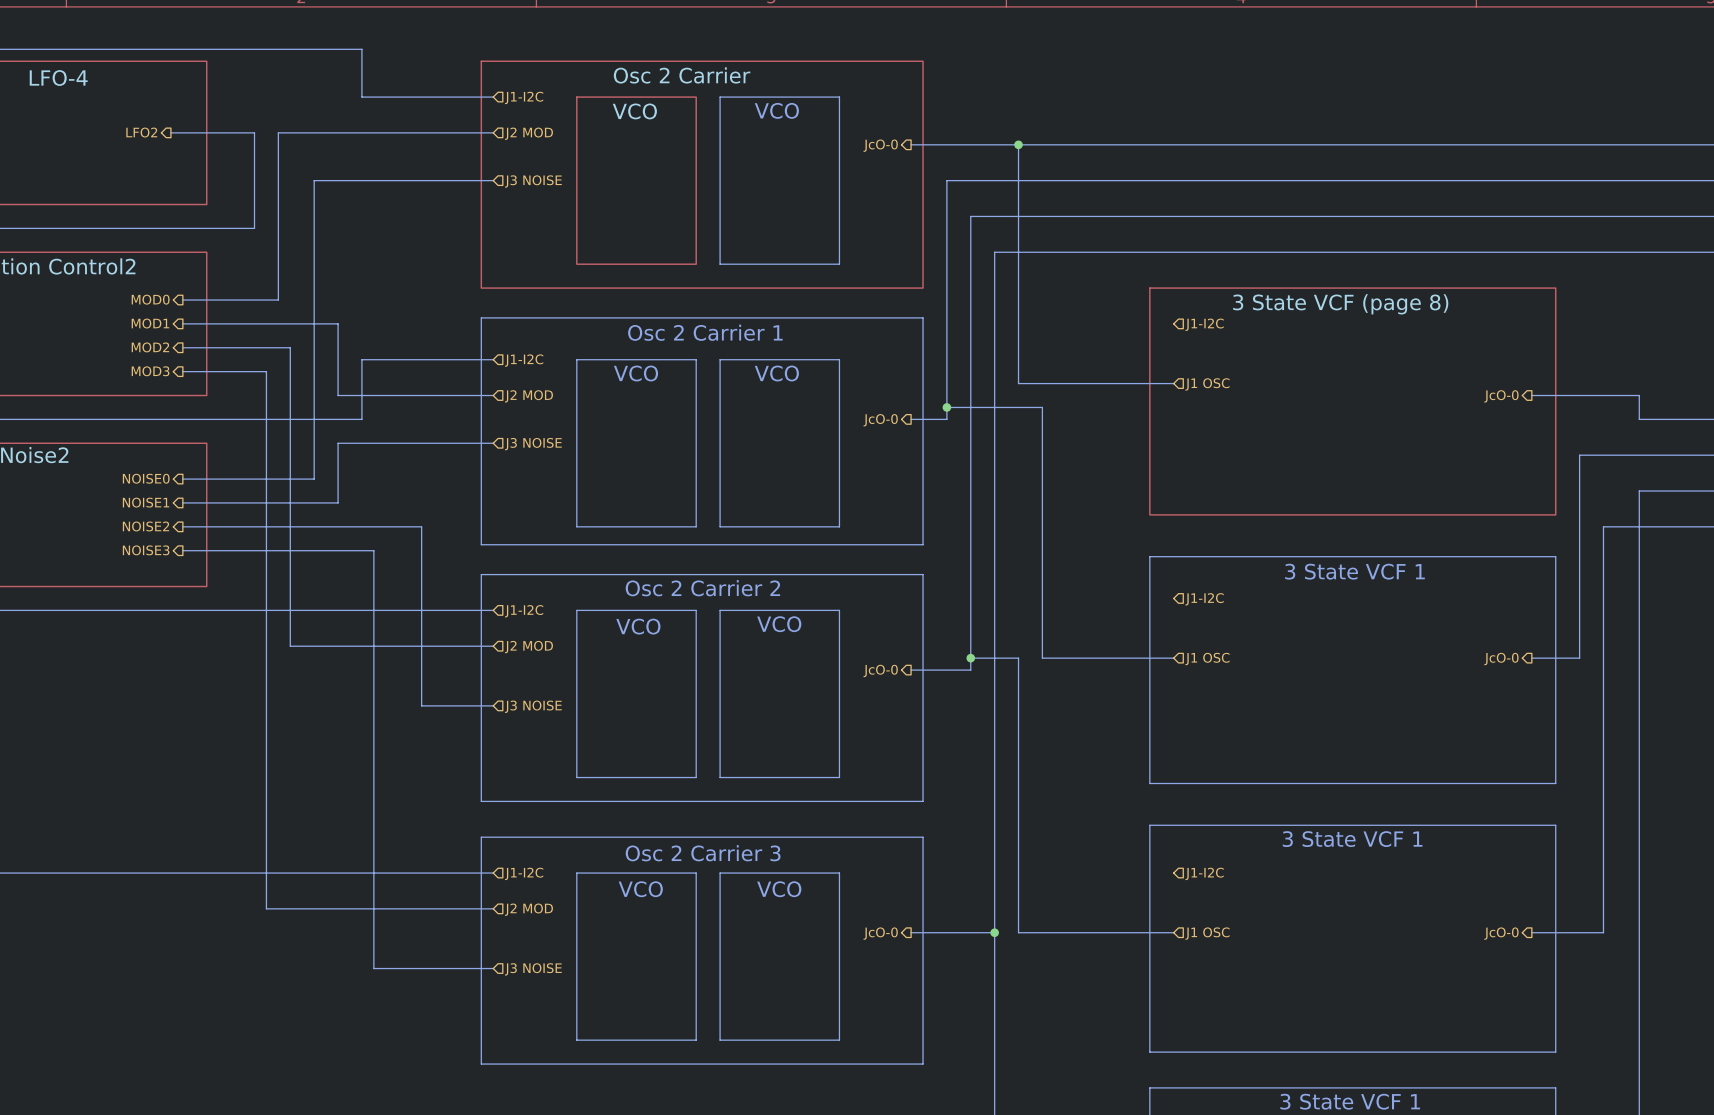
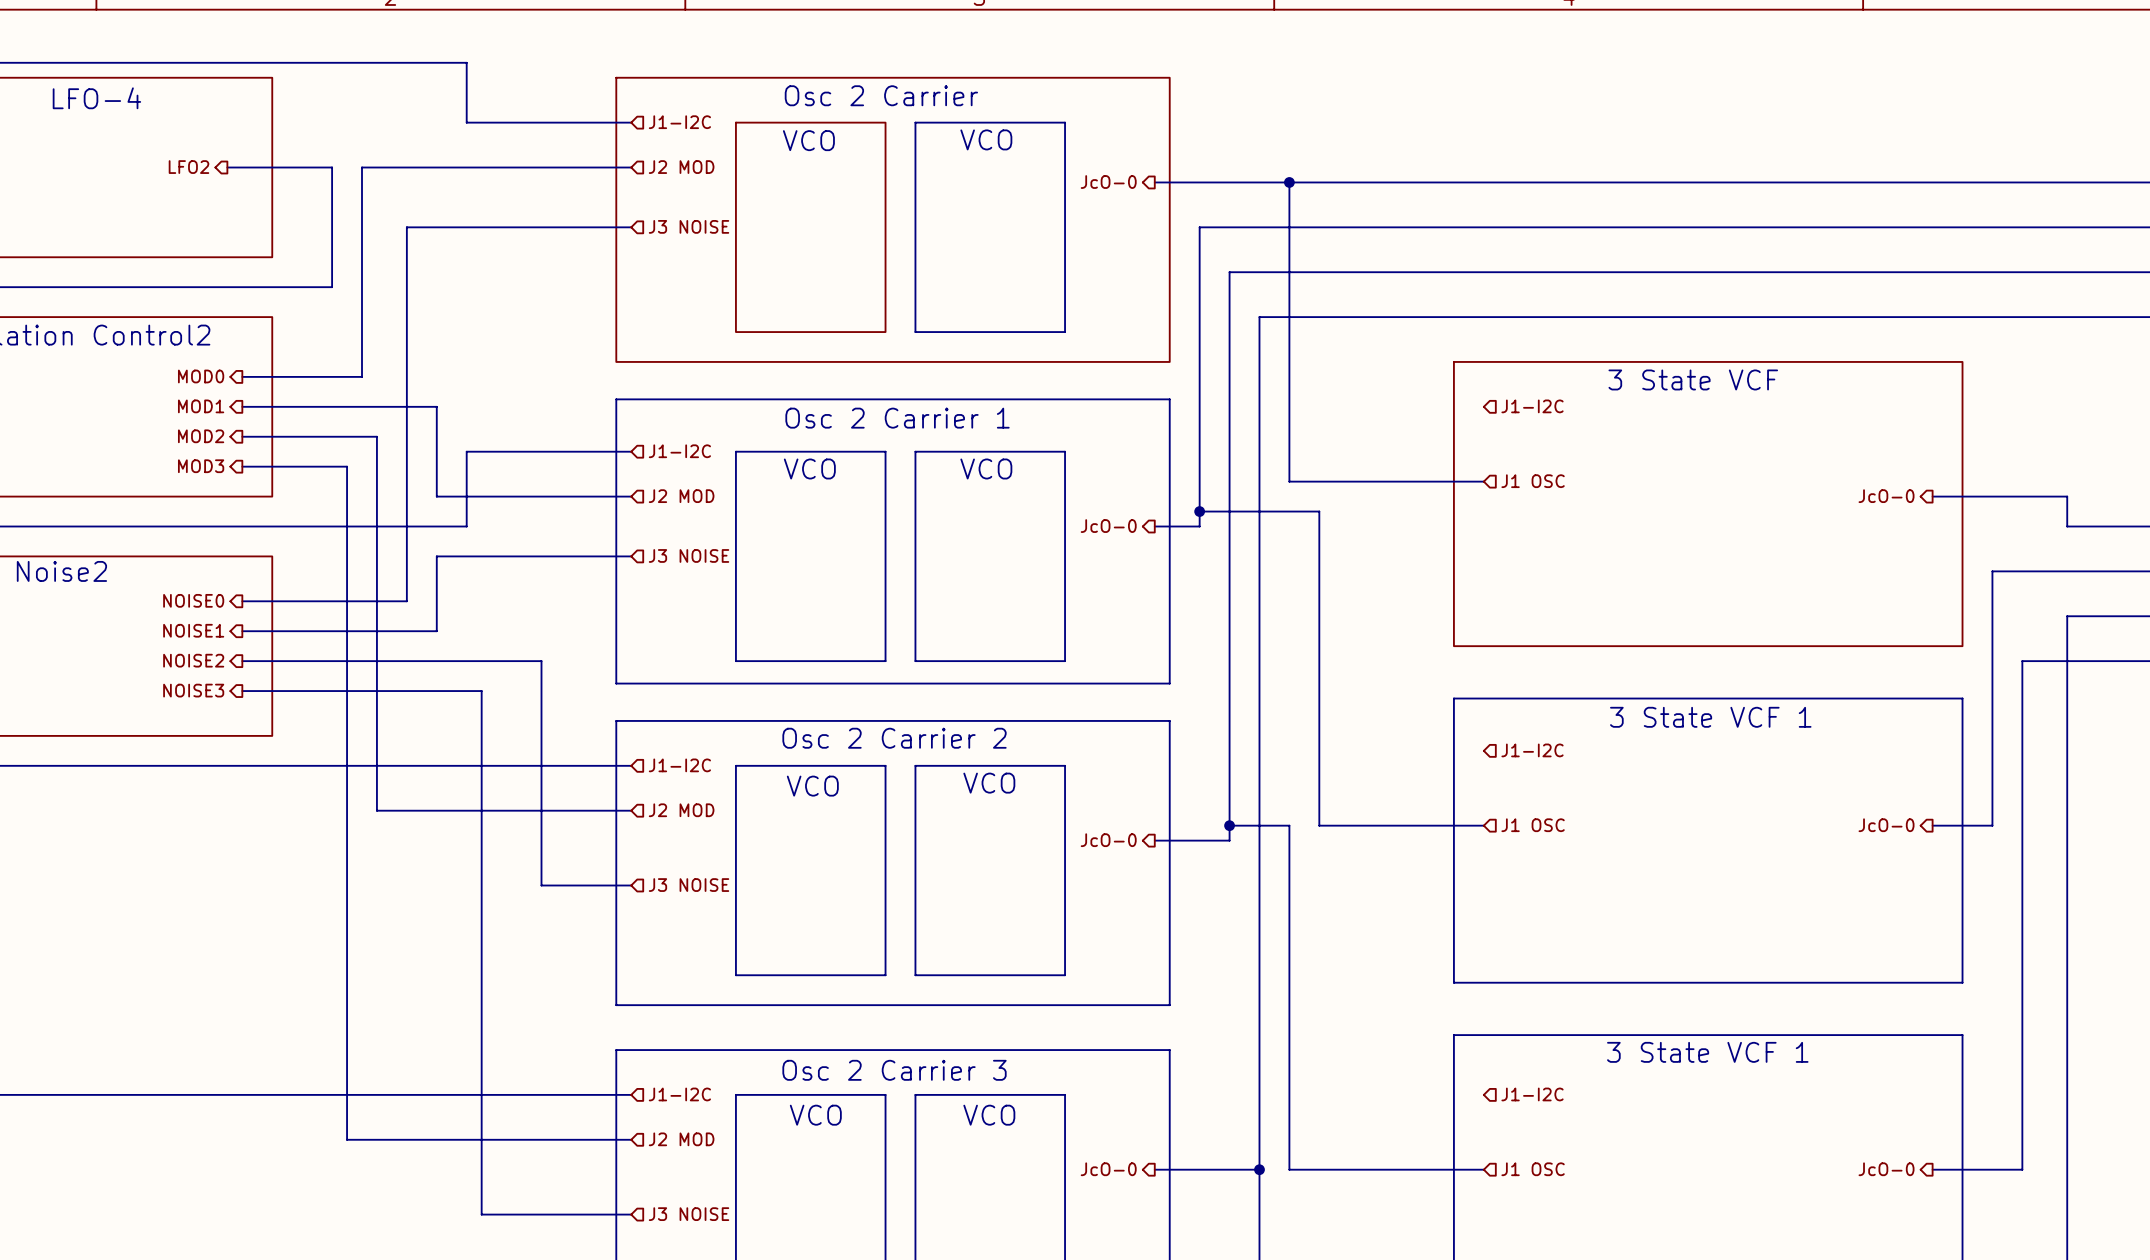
sheet 3 State VCF (page 8) name: 3 State VCF (page 8) (1340, 304) -> 3 State VCF (1693, 379)

